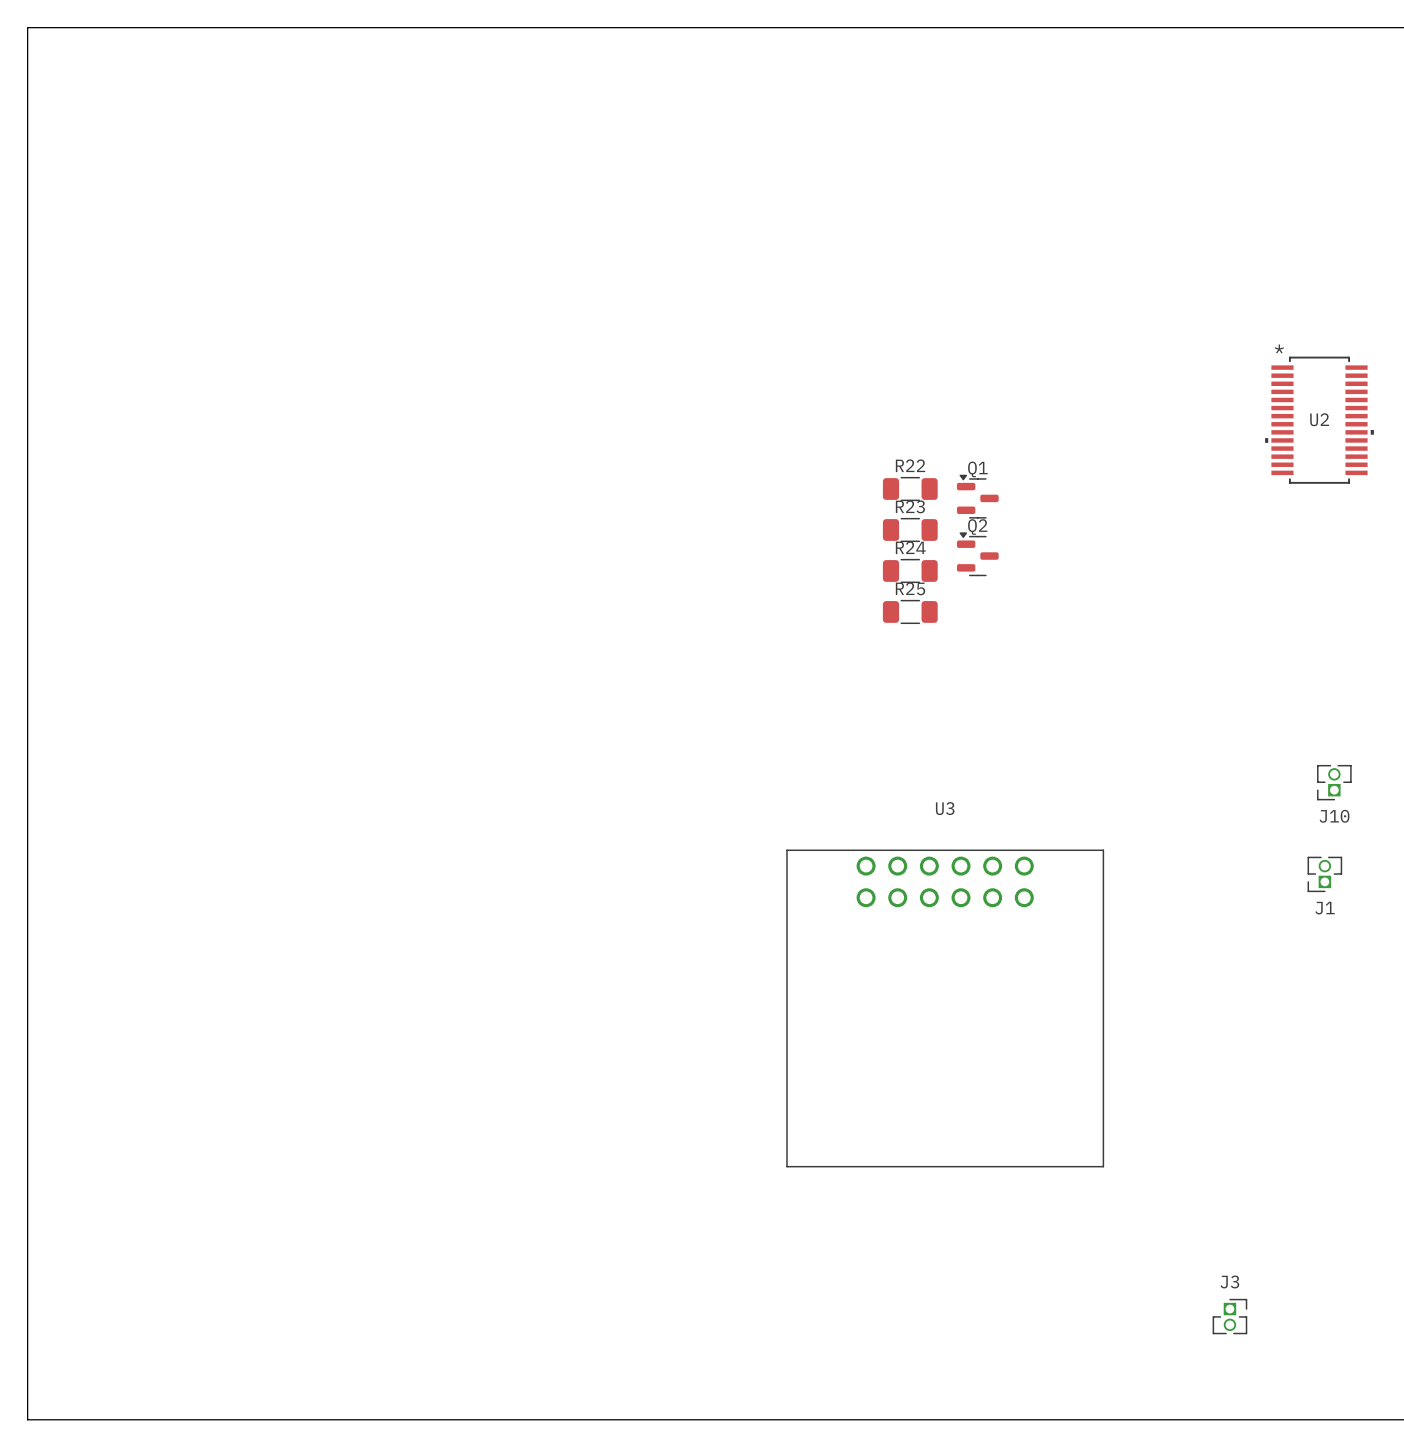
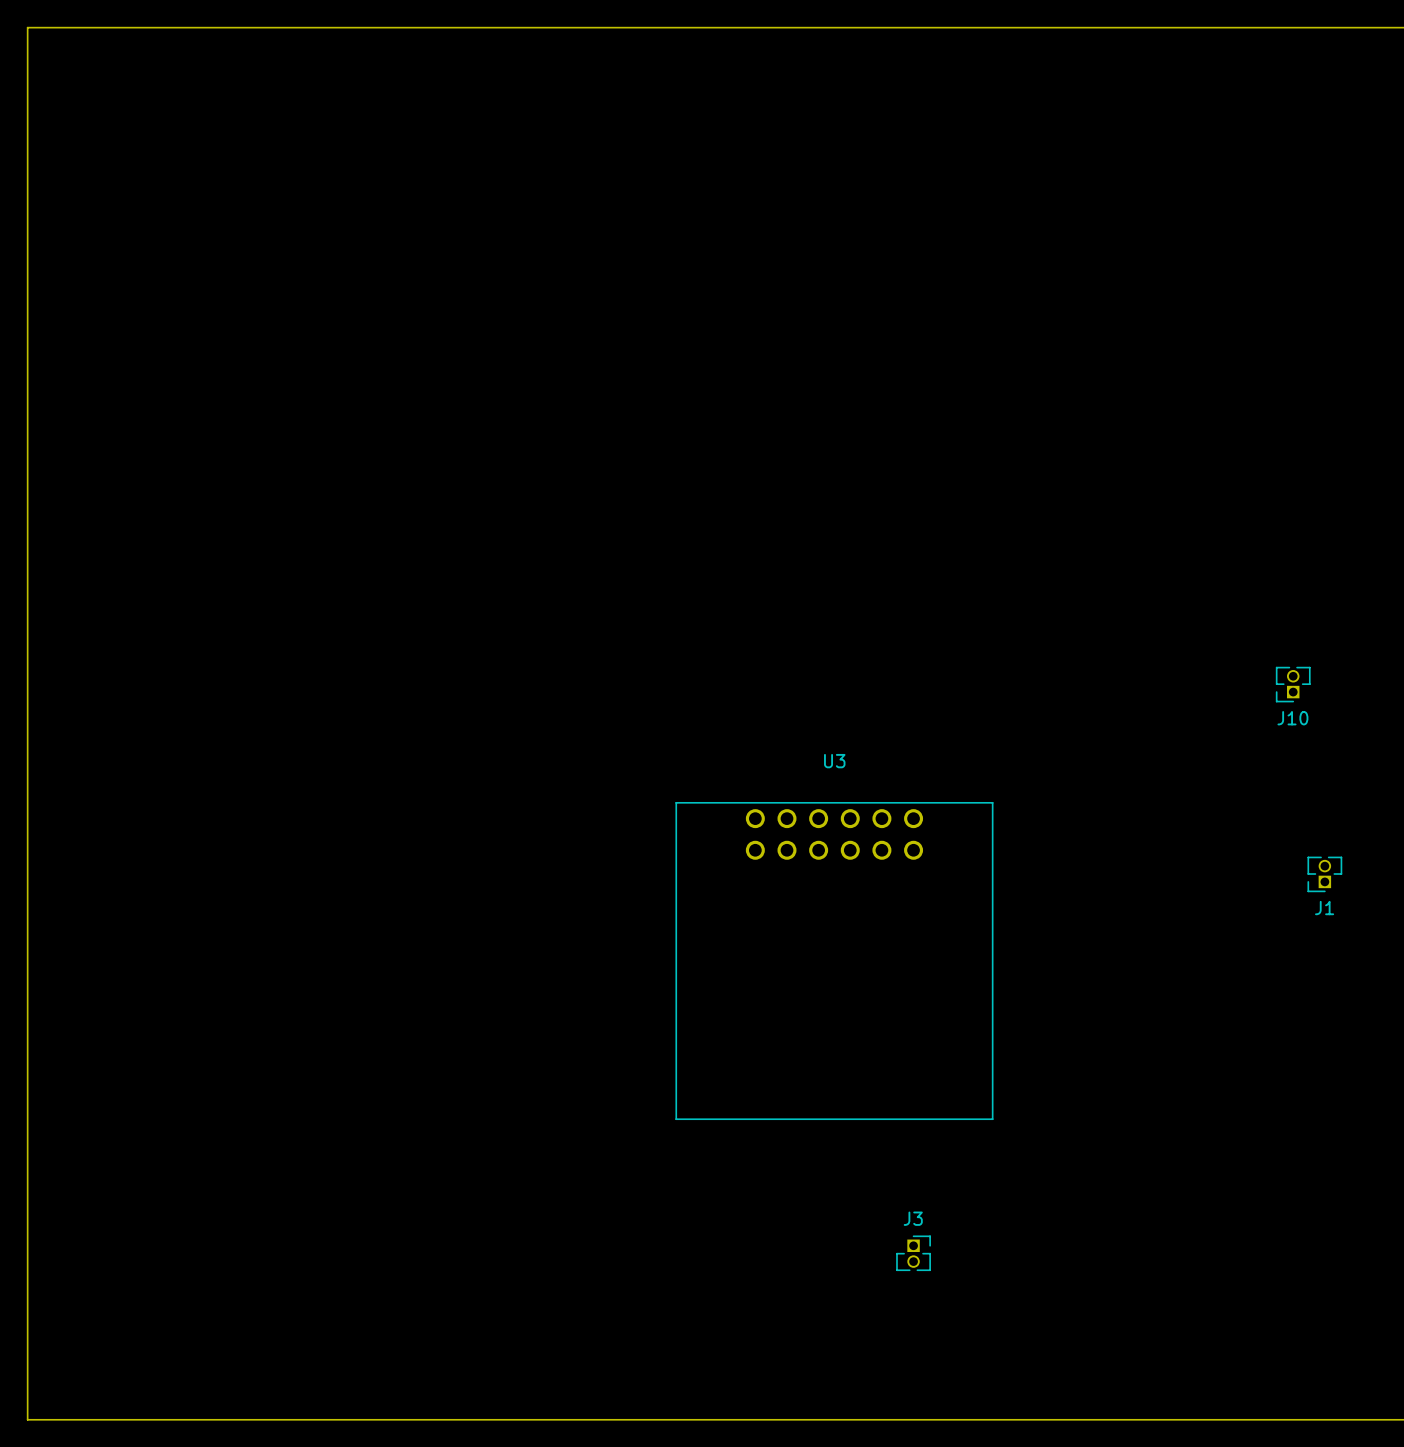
U2: (1319, 420) -> none
R22: (910, 489) -> none
Q1: (977, 496) -> none
R23: (910, 529) -> none
Q2: (977, 554) -> none
R24: (910, 570) -> none
R25: (910, 611) -> none
J10 position: (1334, 782) -> (1293, 684)
U3 position: (945, 1008) -> (834, 961)
J3 position: (1229, 1316) -> (913, 1253)

